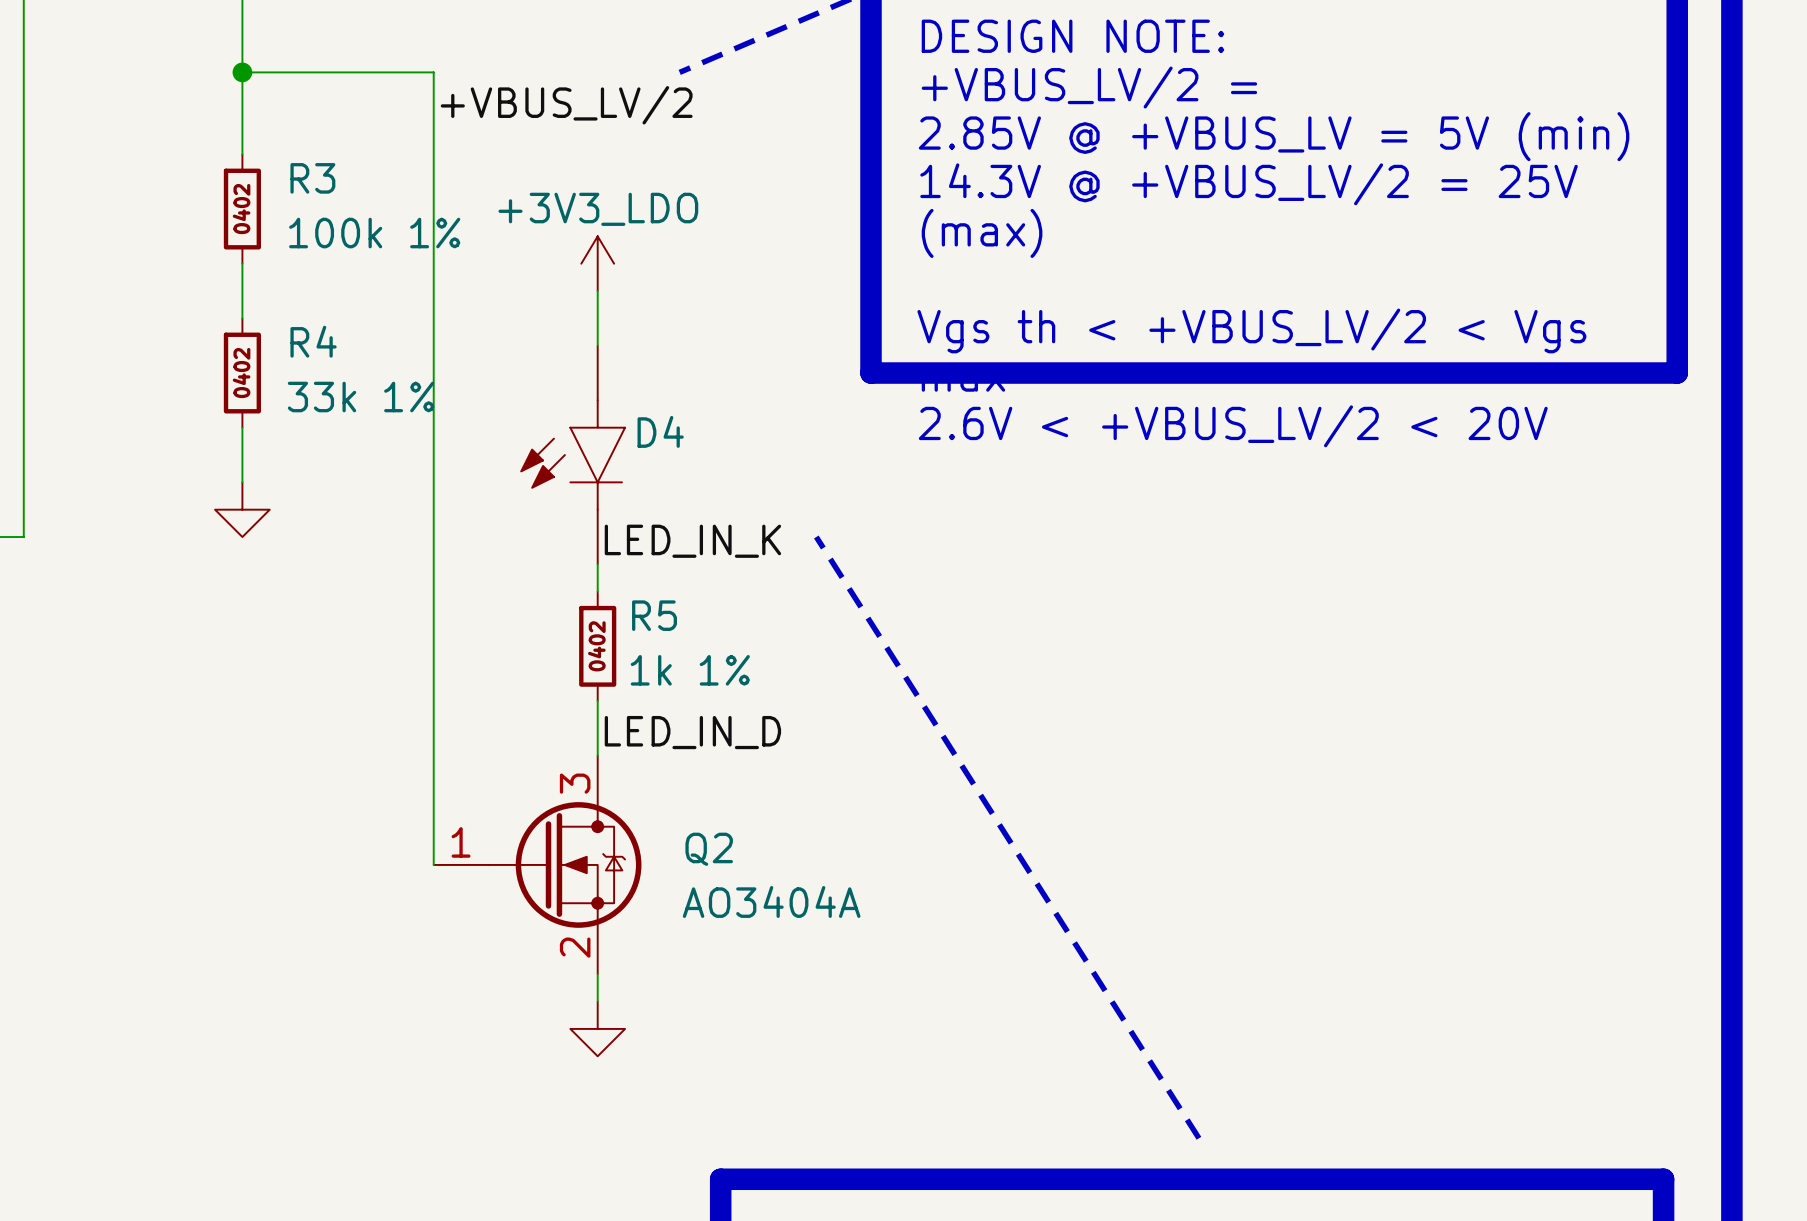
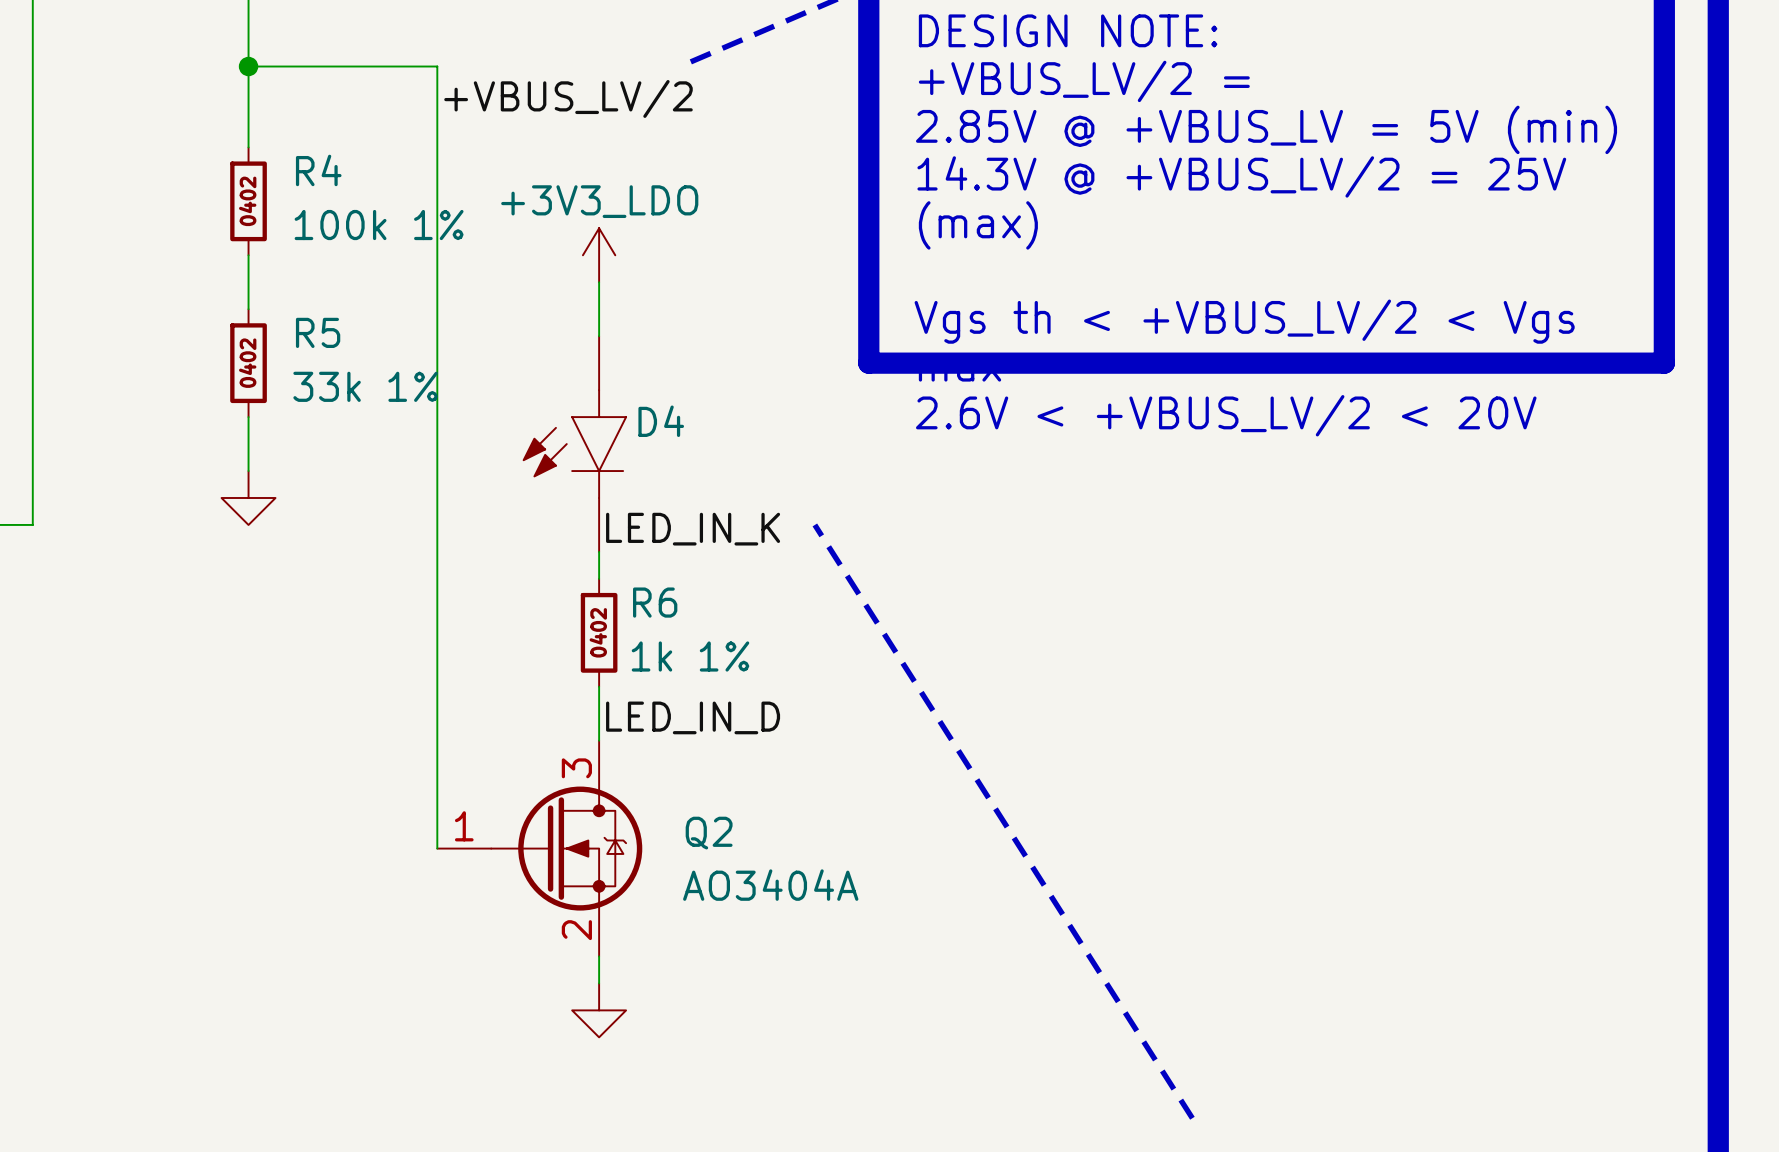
R3 name: R3 (312, 178) -> R4 (318, 170)
R4 name: R4 (313, 341) -> R5 (318, 332)
R5 name: R5 (654, 615) -> R6 (655, 602)

